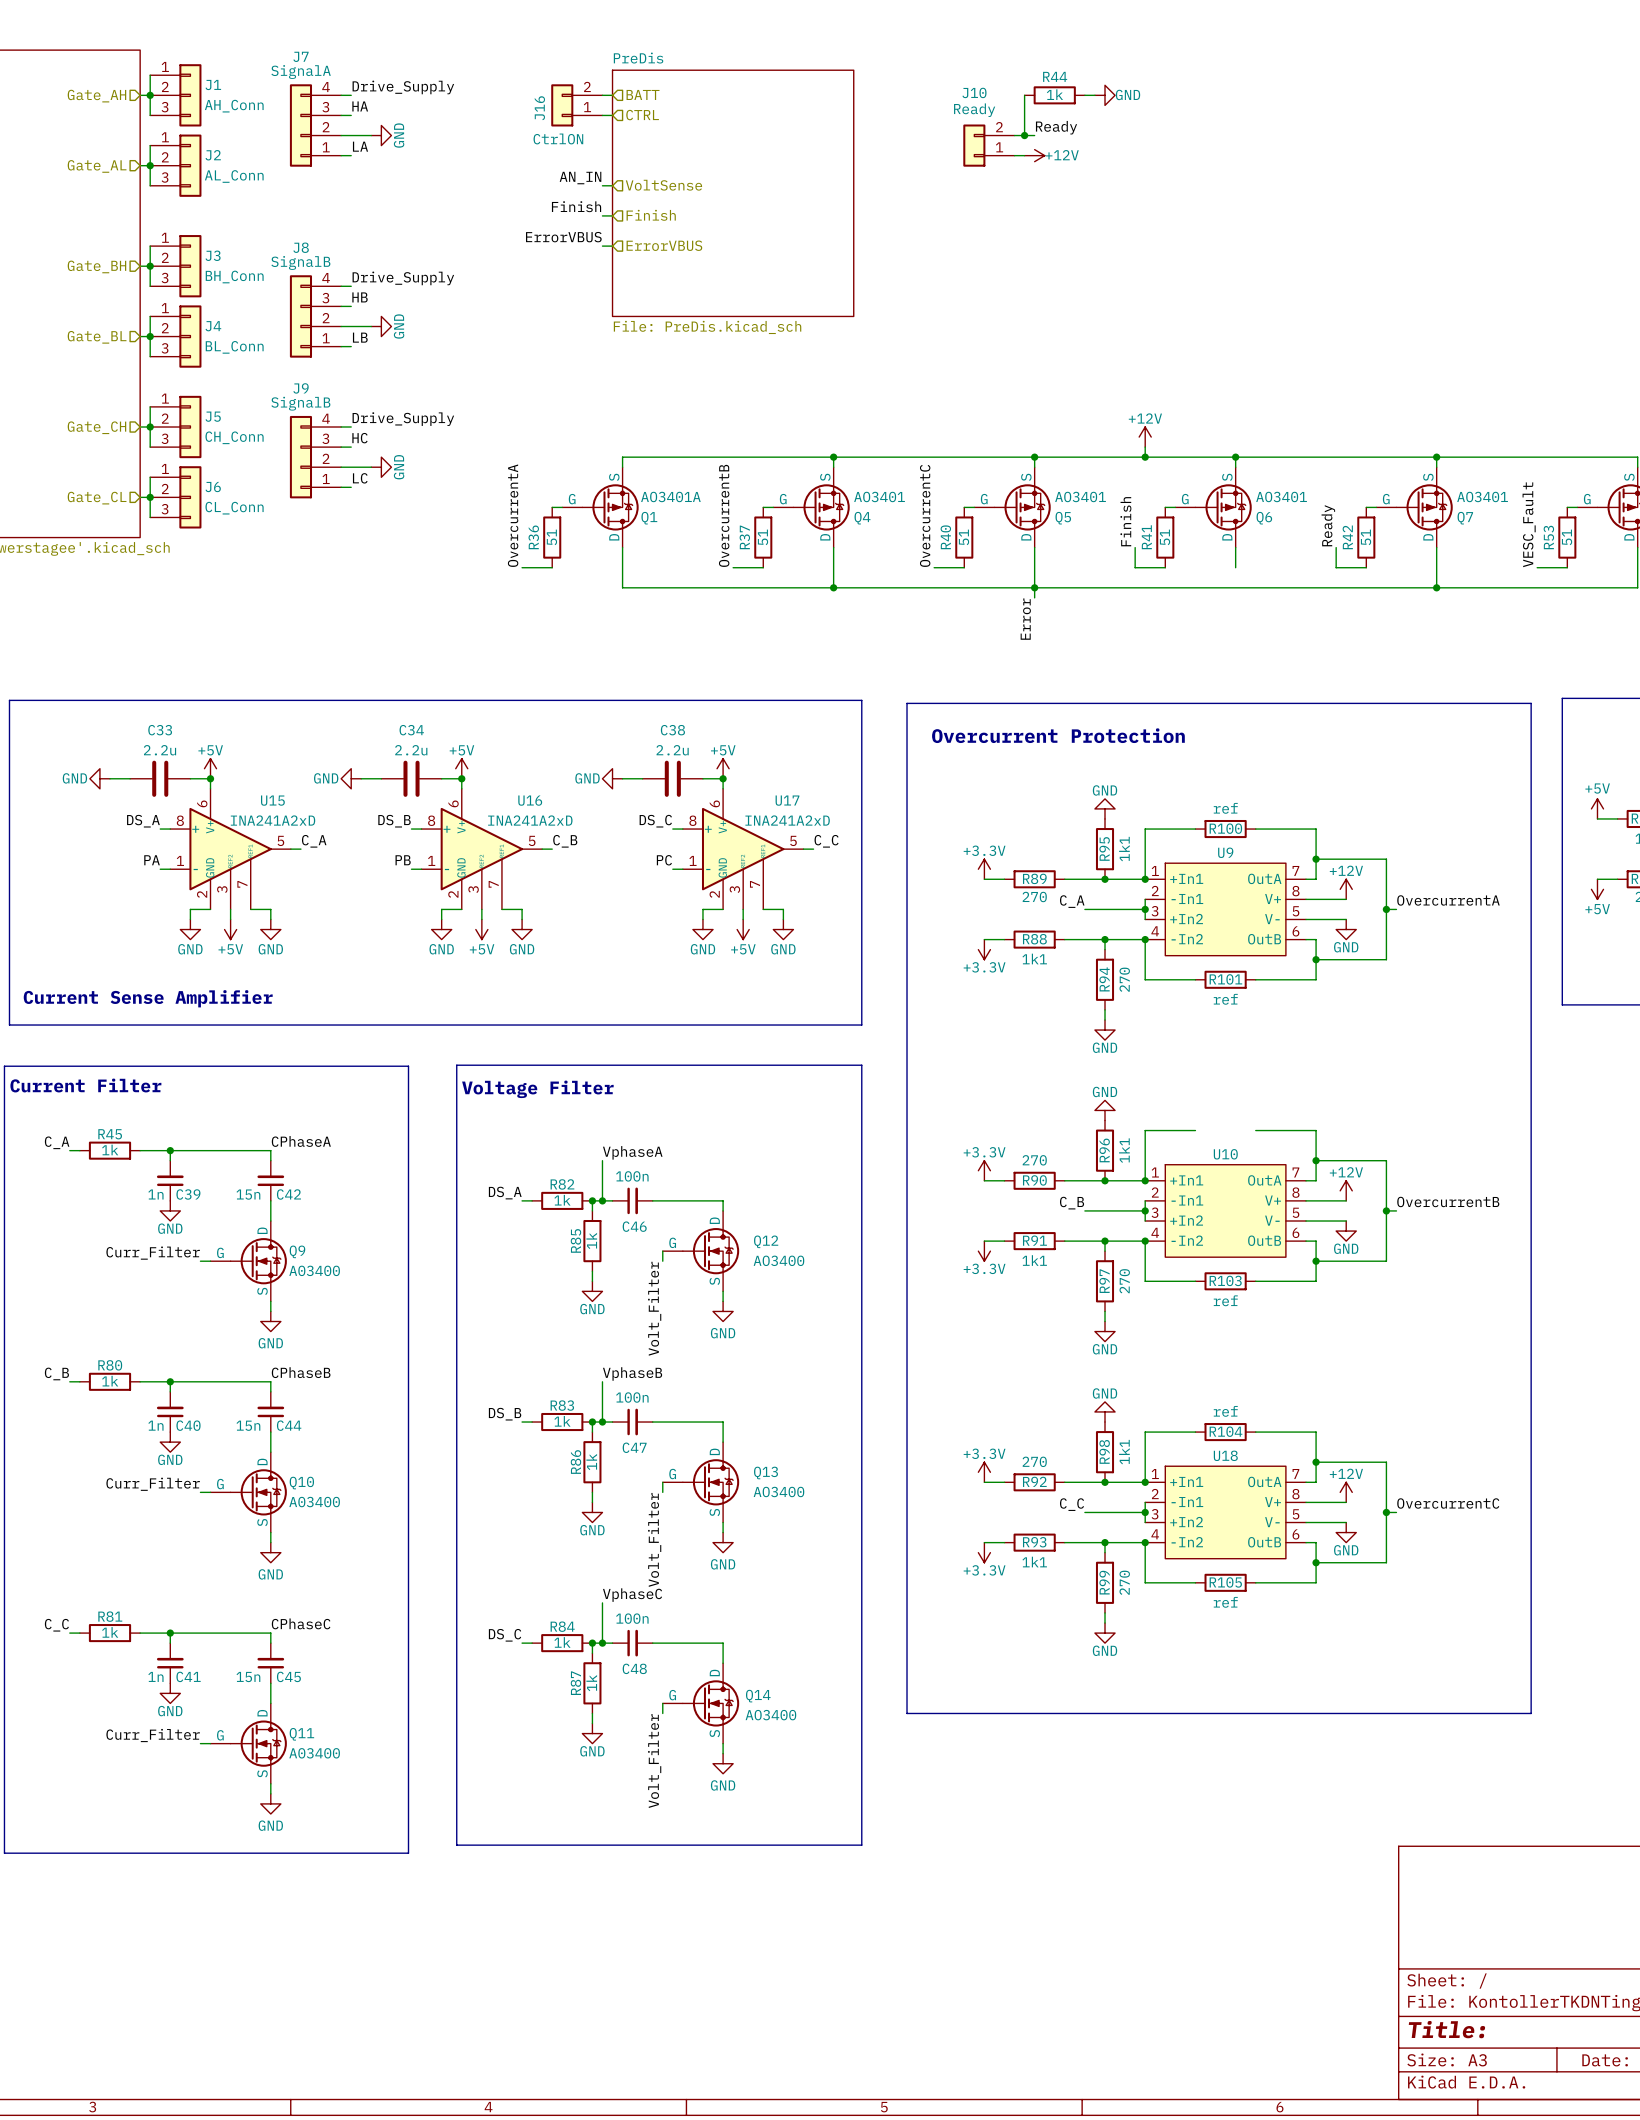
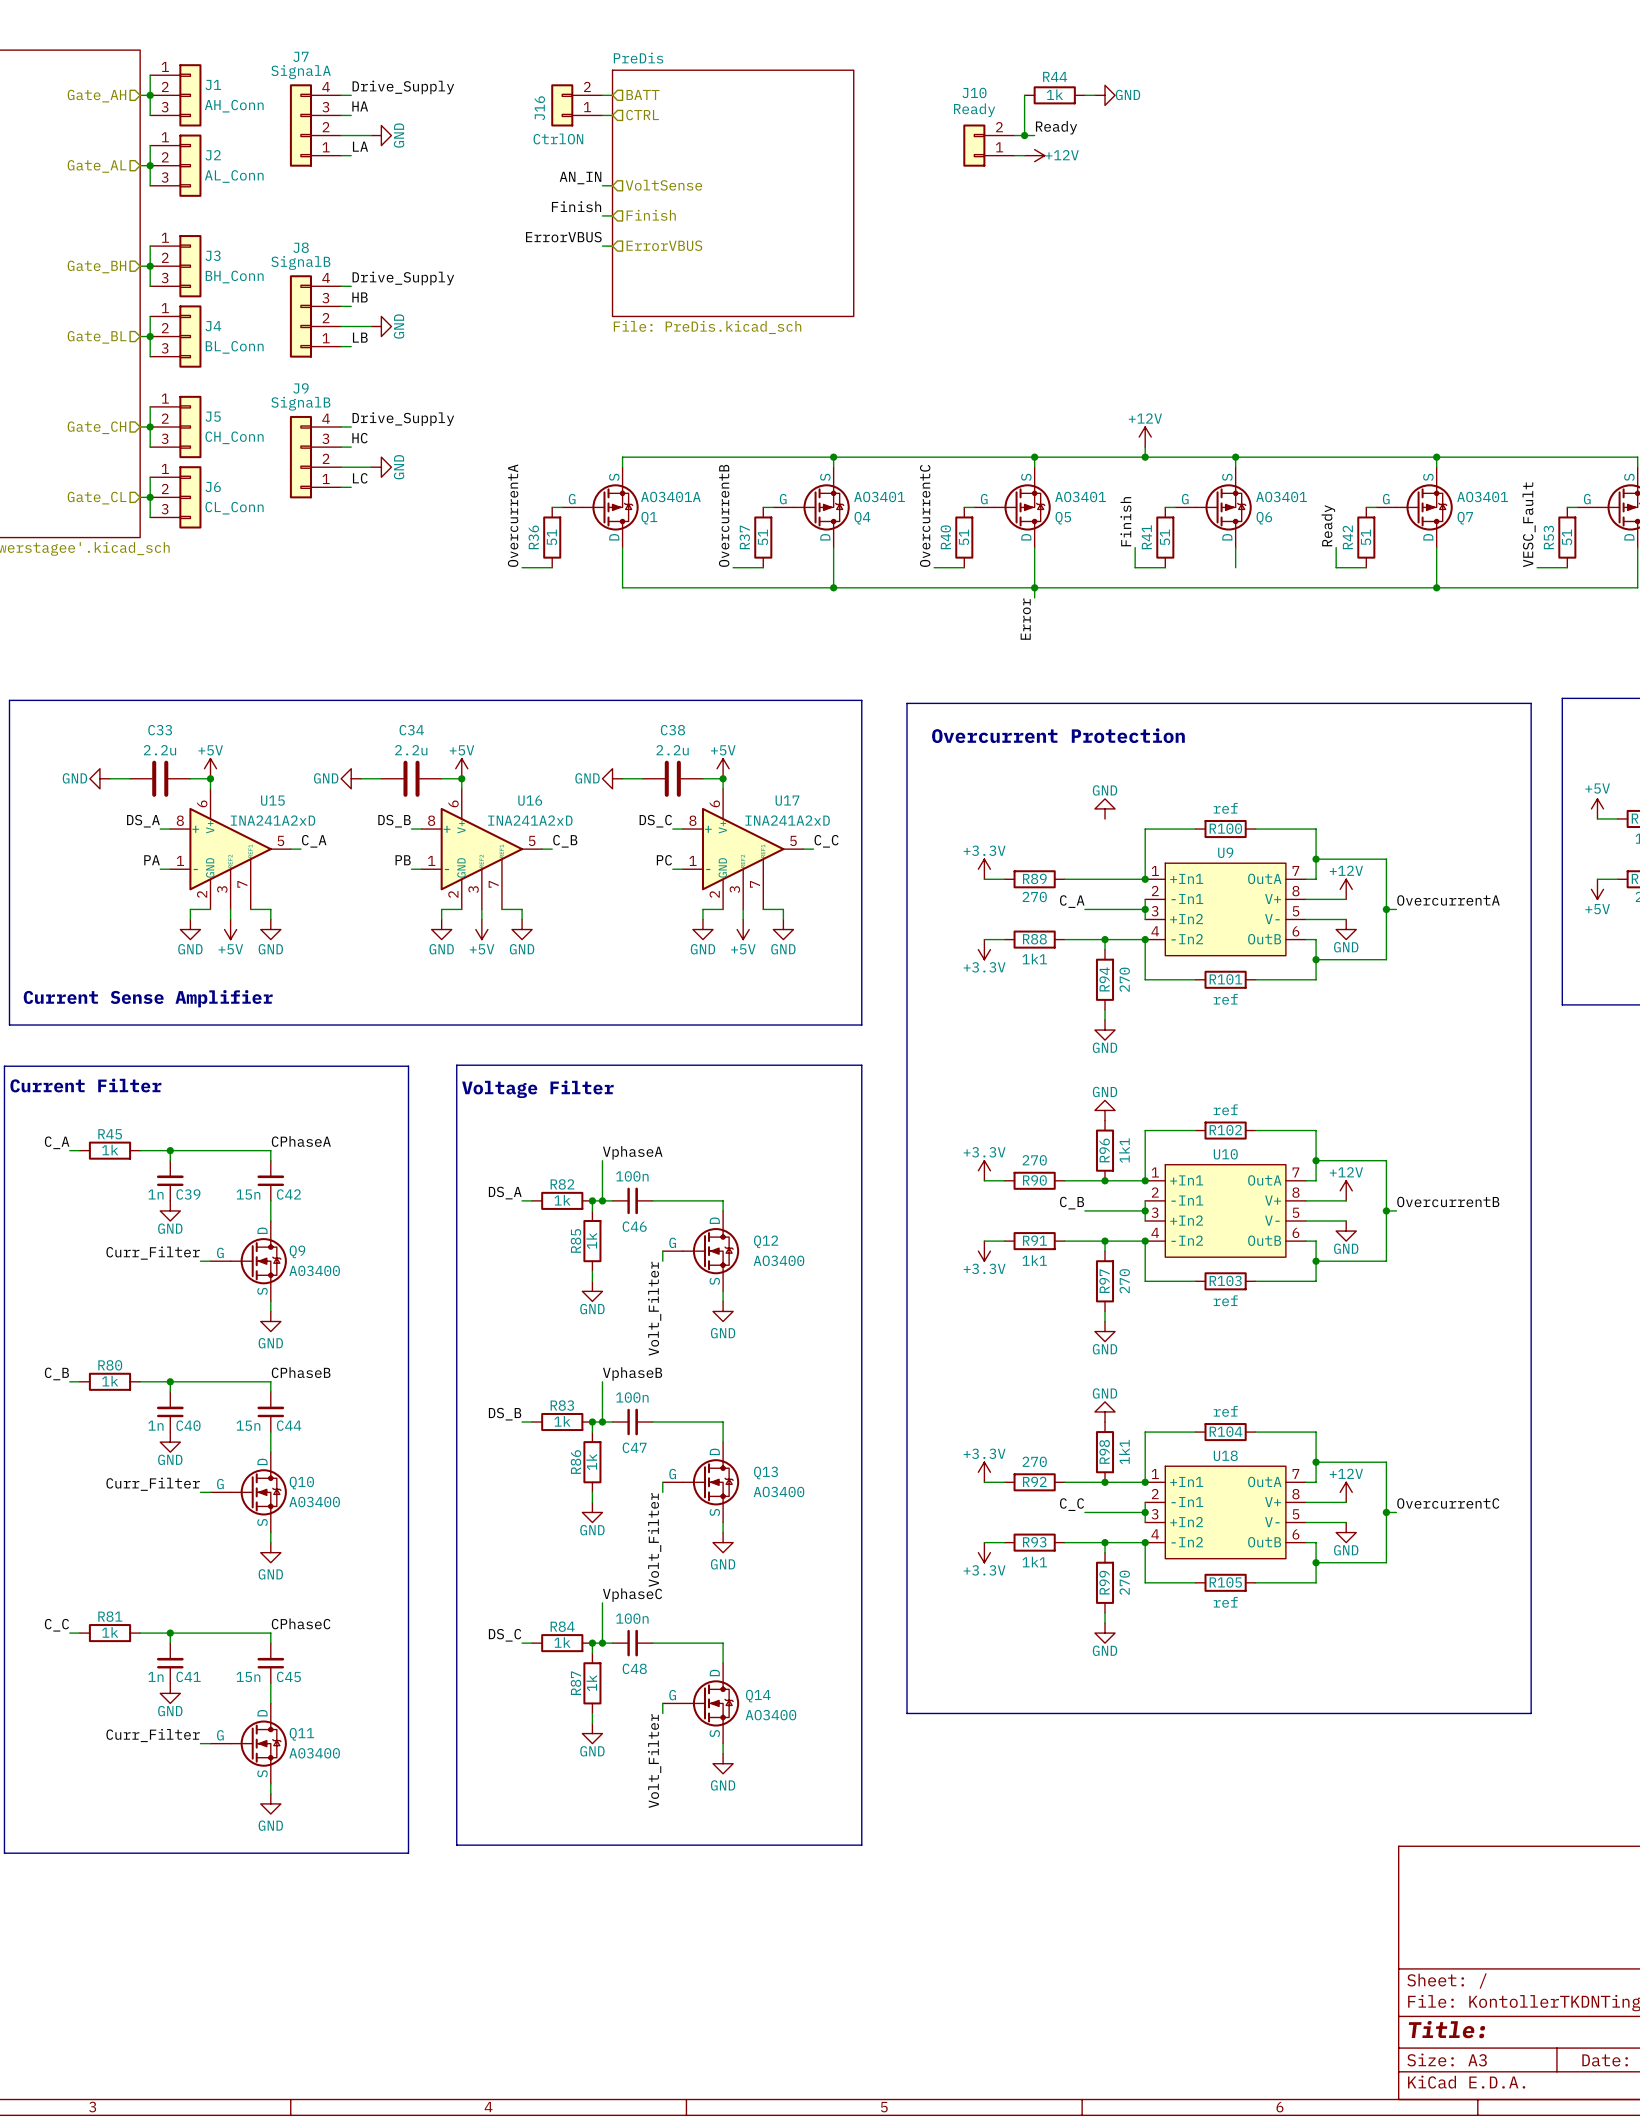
R95: 1k1 (1105, 849) -> none
junction: (1105, 879) -> none
R102: none -> ref (1225, 1130)

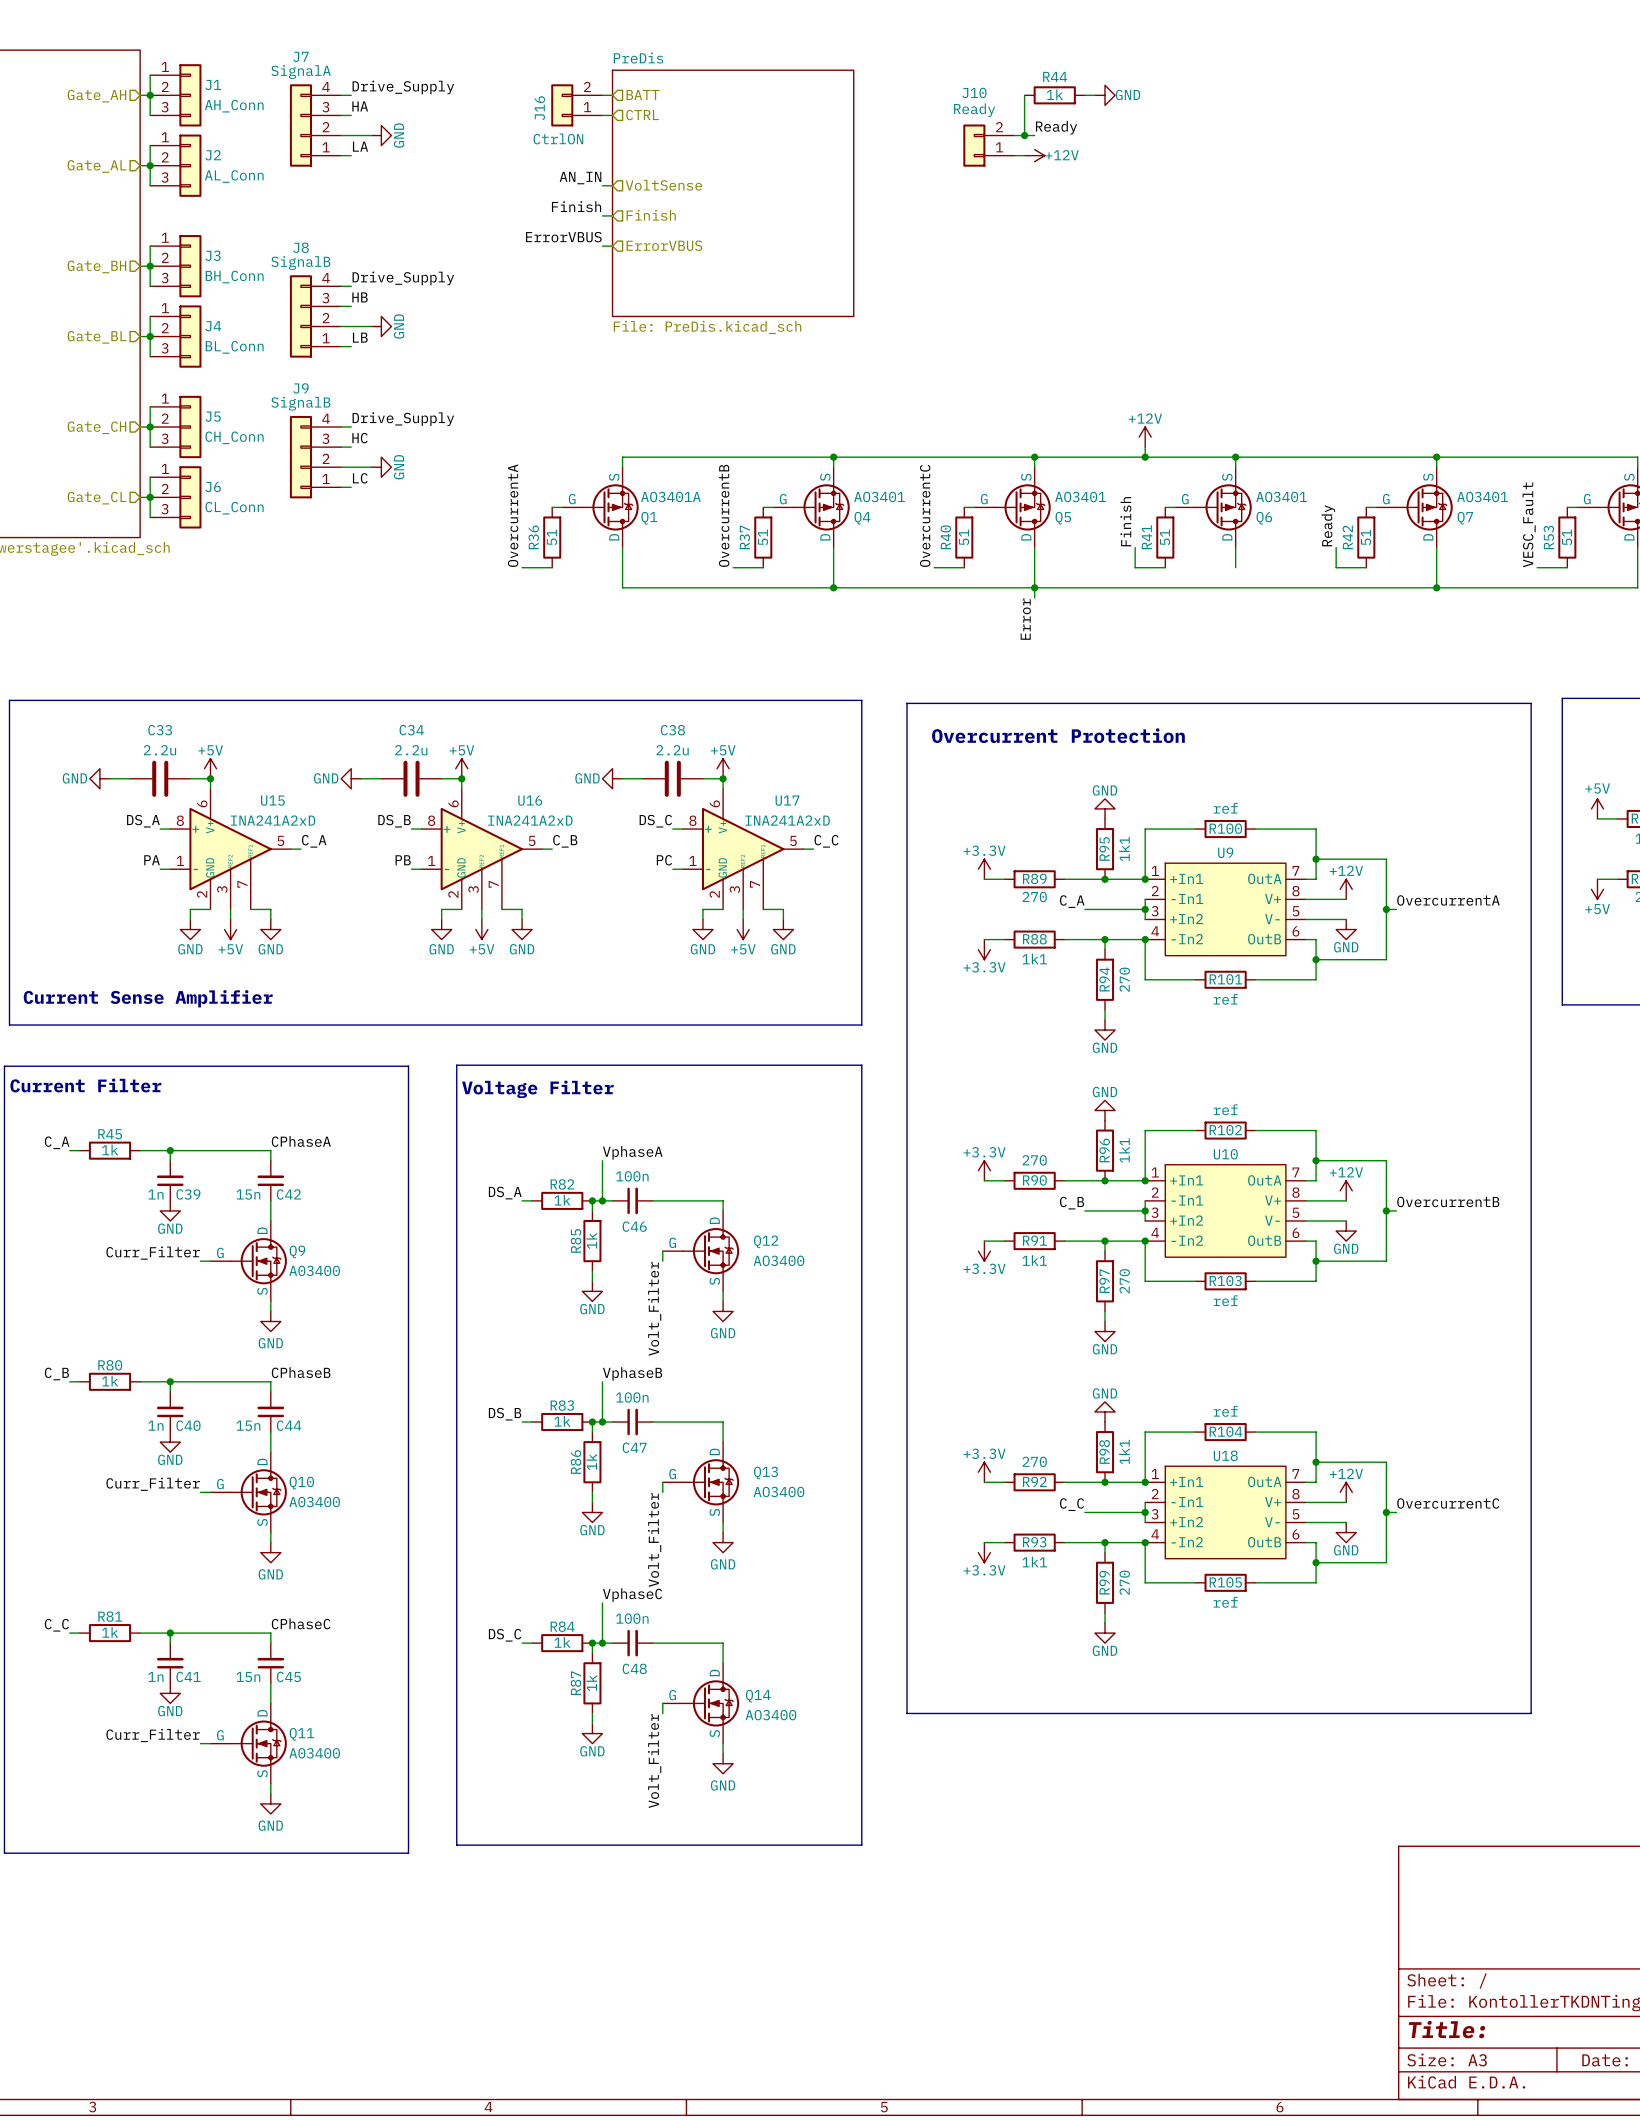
R95: none -> 1k1 (1105, 849)
junction: none -> (1105, 879)

